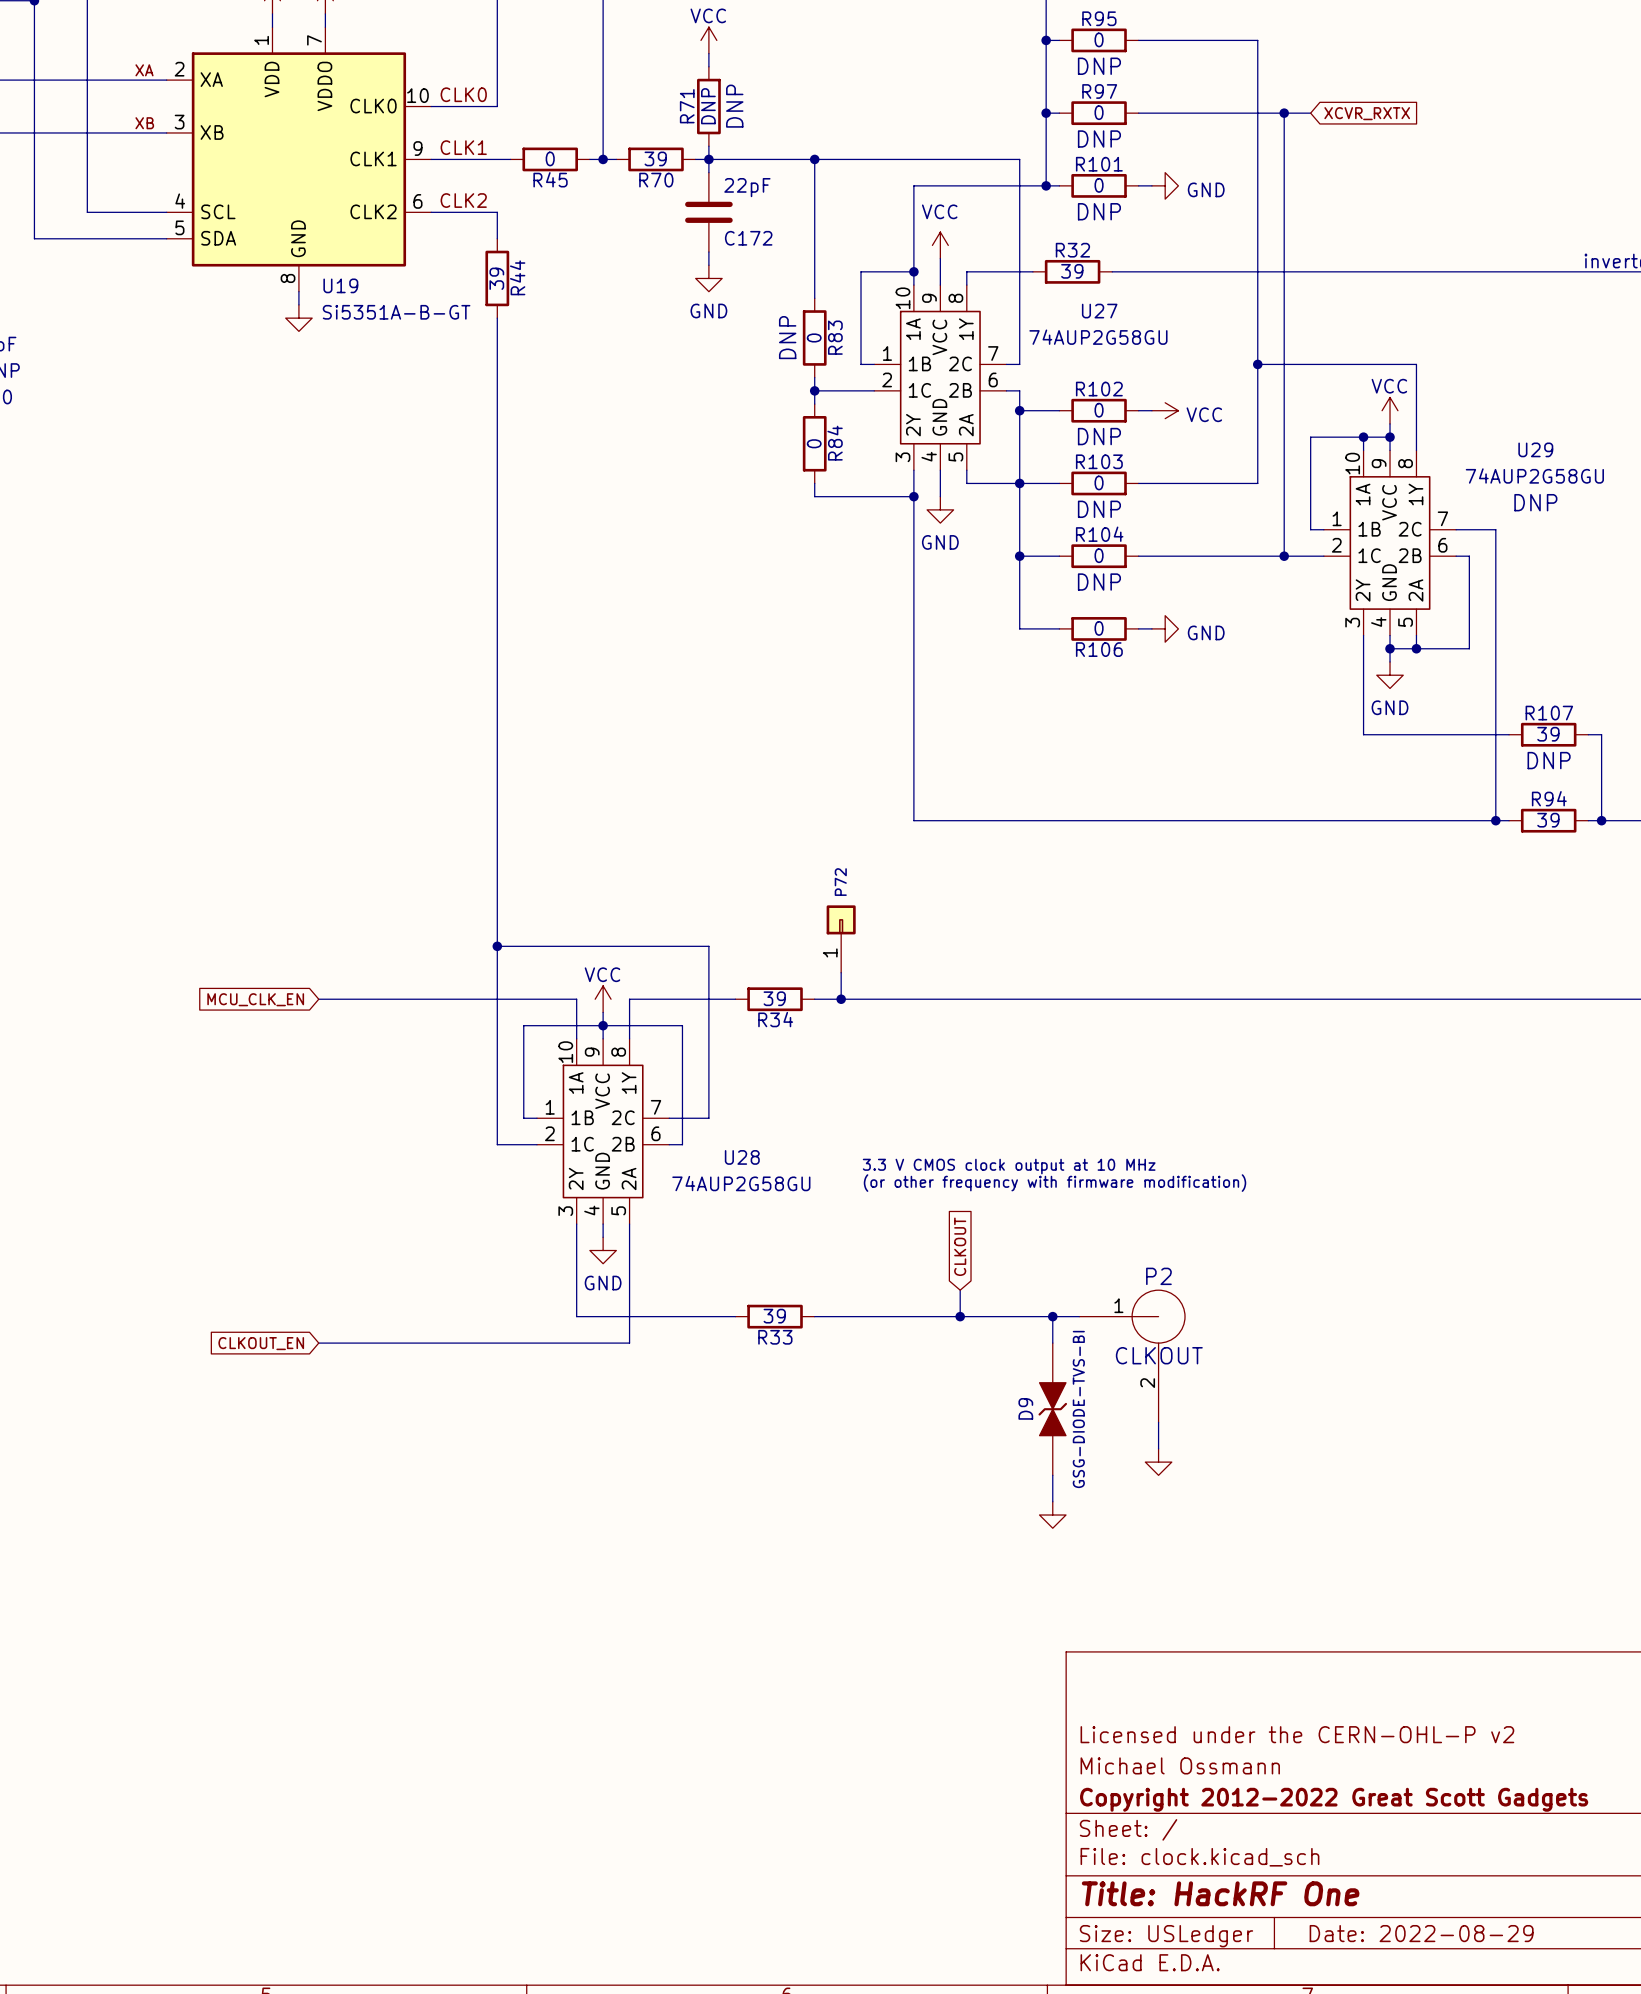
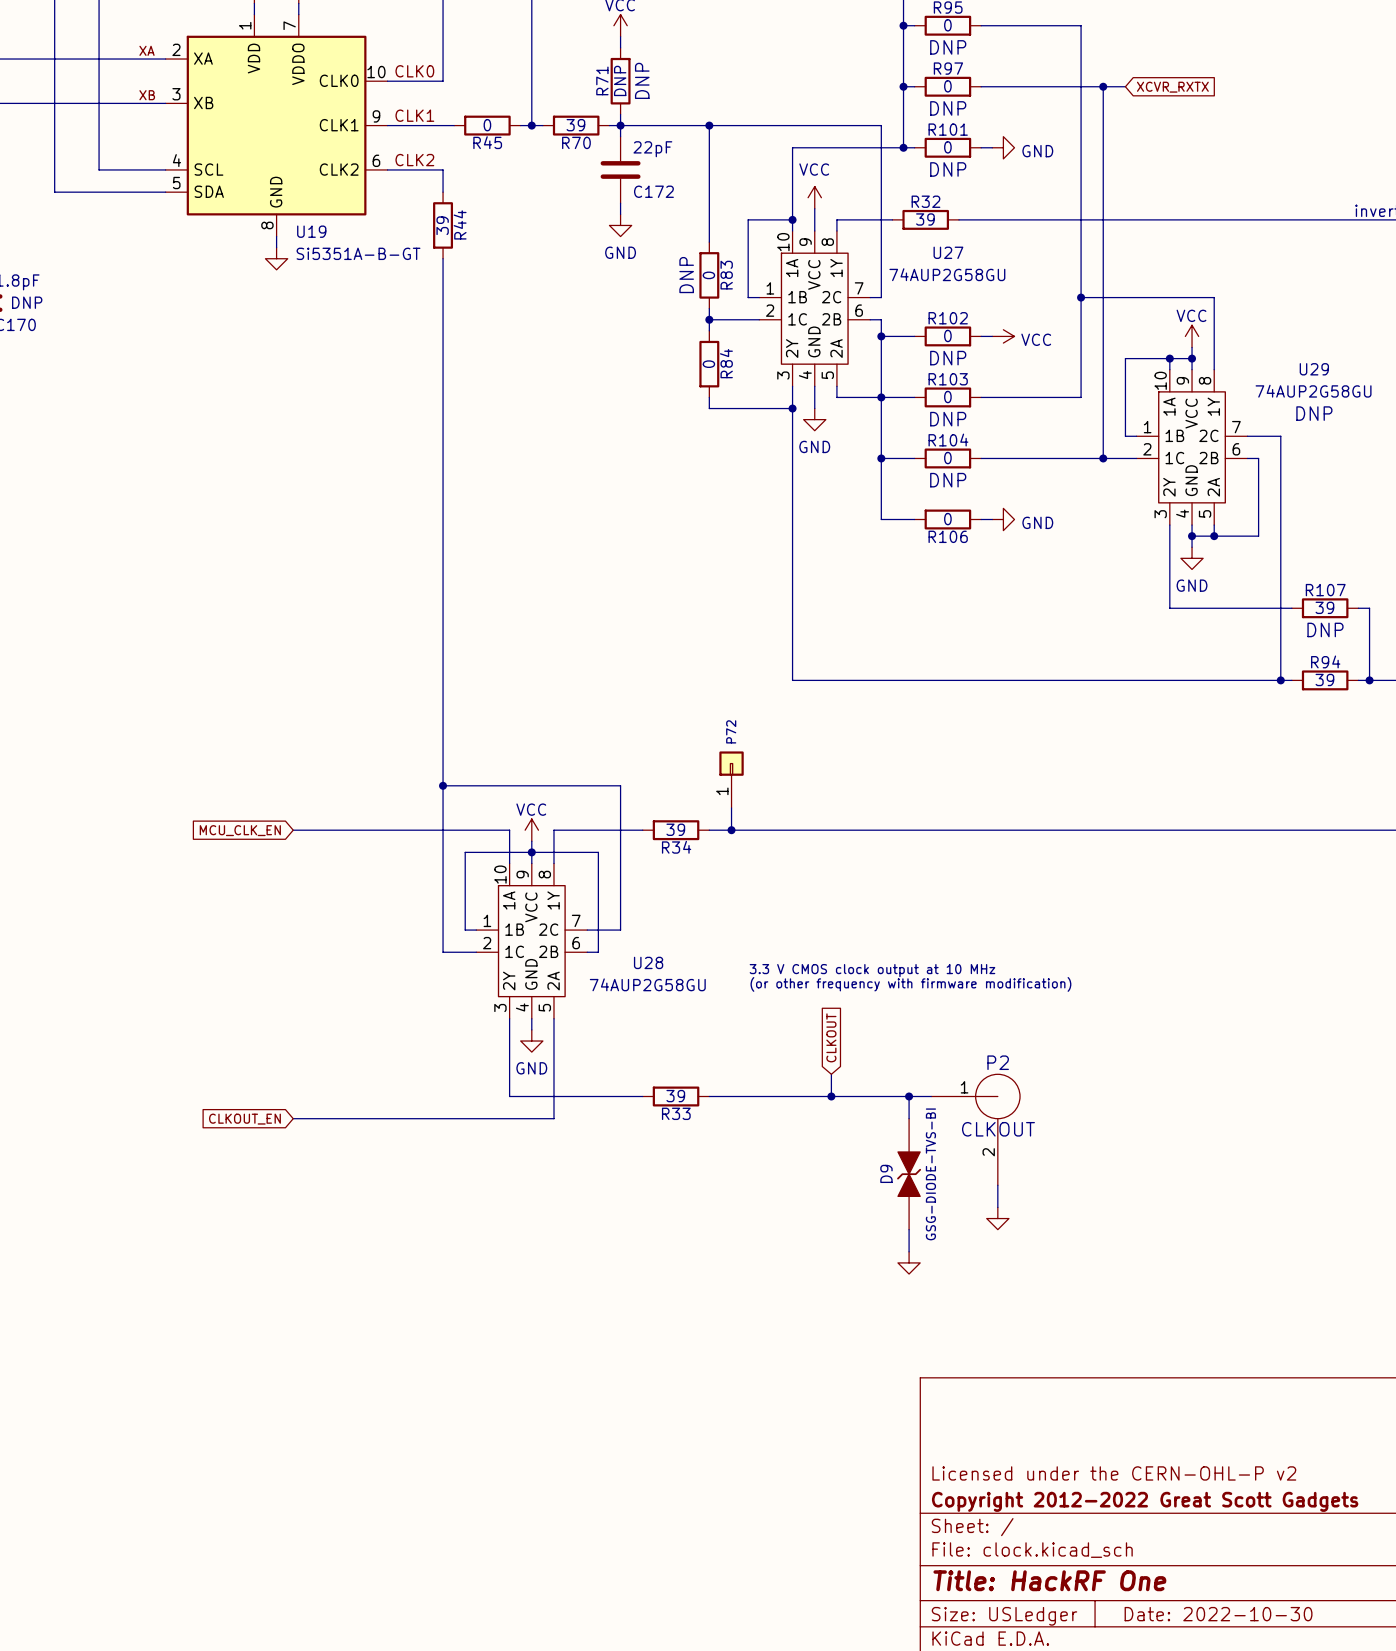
title block: Licensed under the CERN-OHL-P v2 (1297, 1734) -> none
title block: Michael Ossmann (1180, 1765) -> Licensed under the CERN-OHL-P v2 (1114, 1473)
title block: Date: 2022-08-29 (1421, 1933) -> Date: 2022-10-30 (1218, 1614)

